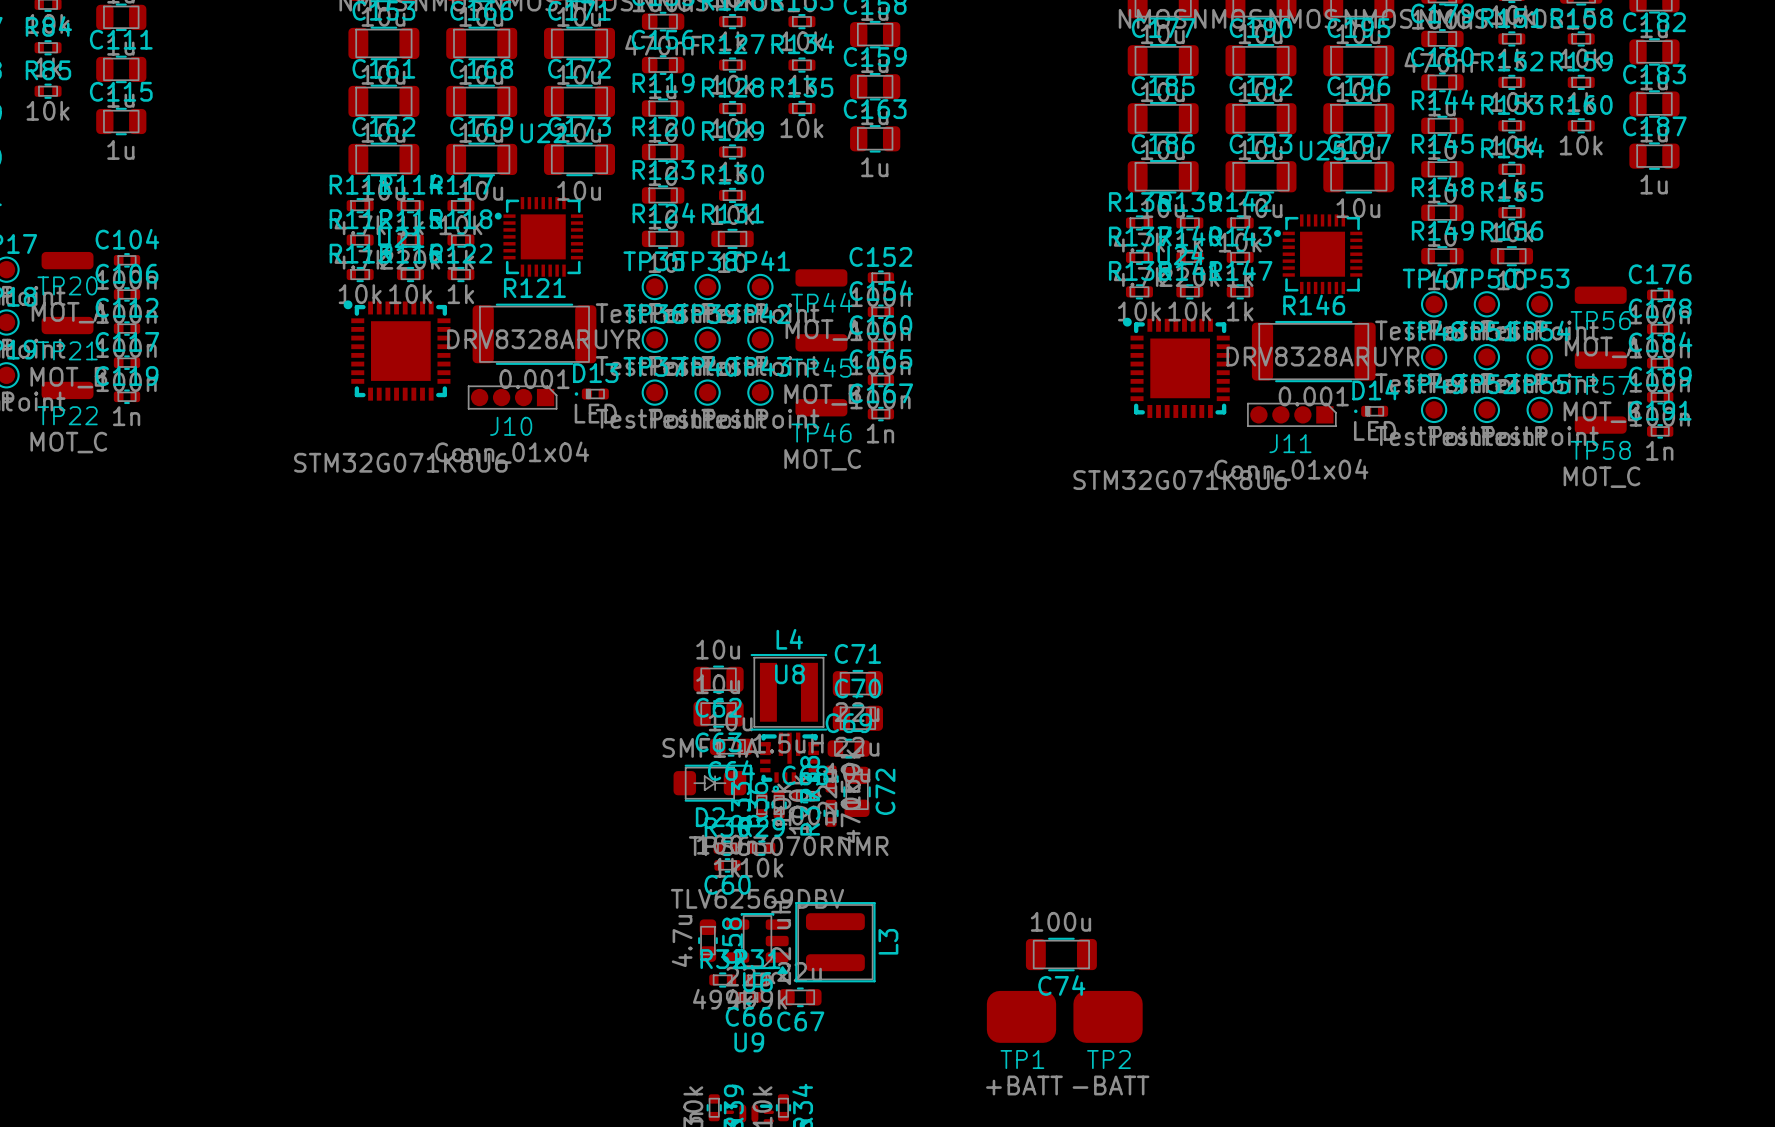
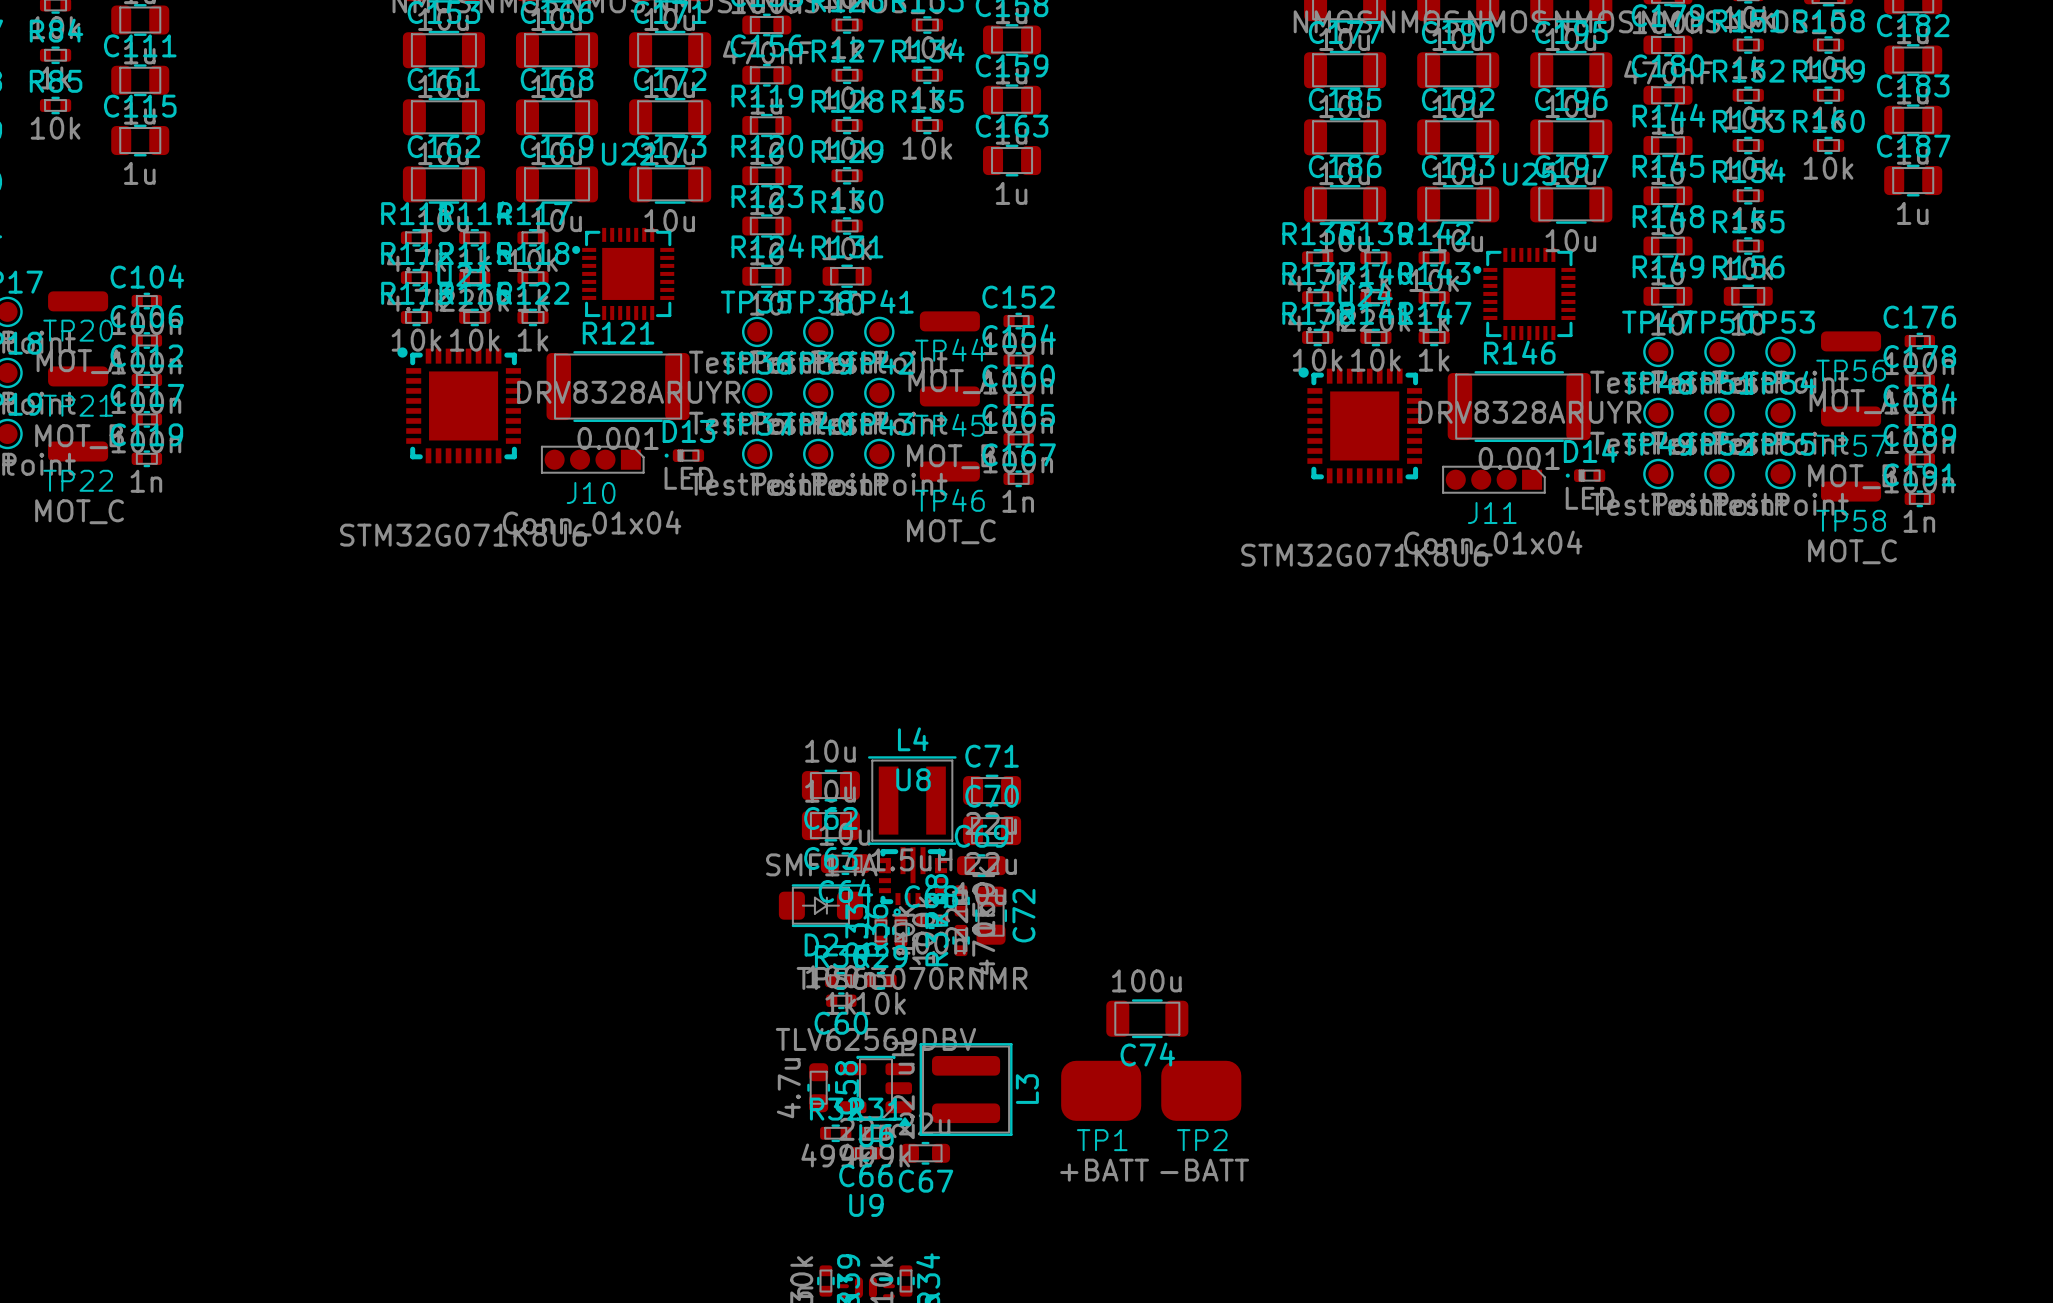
C74 position: (1061, 954) -> (1147, 1018)
TP1 position: (1021, 1016) -> (1101, 1090)
TP2 position: (1108, 1016) -> (1201, 1090)

